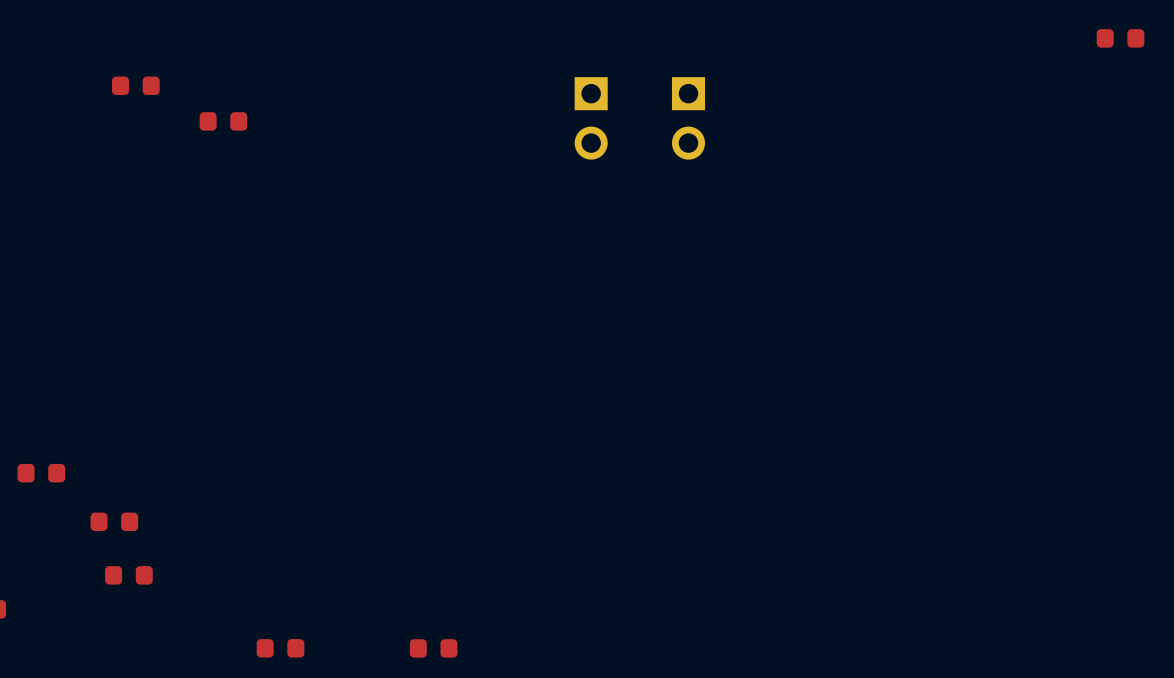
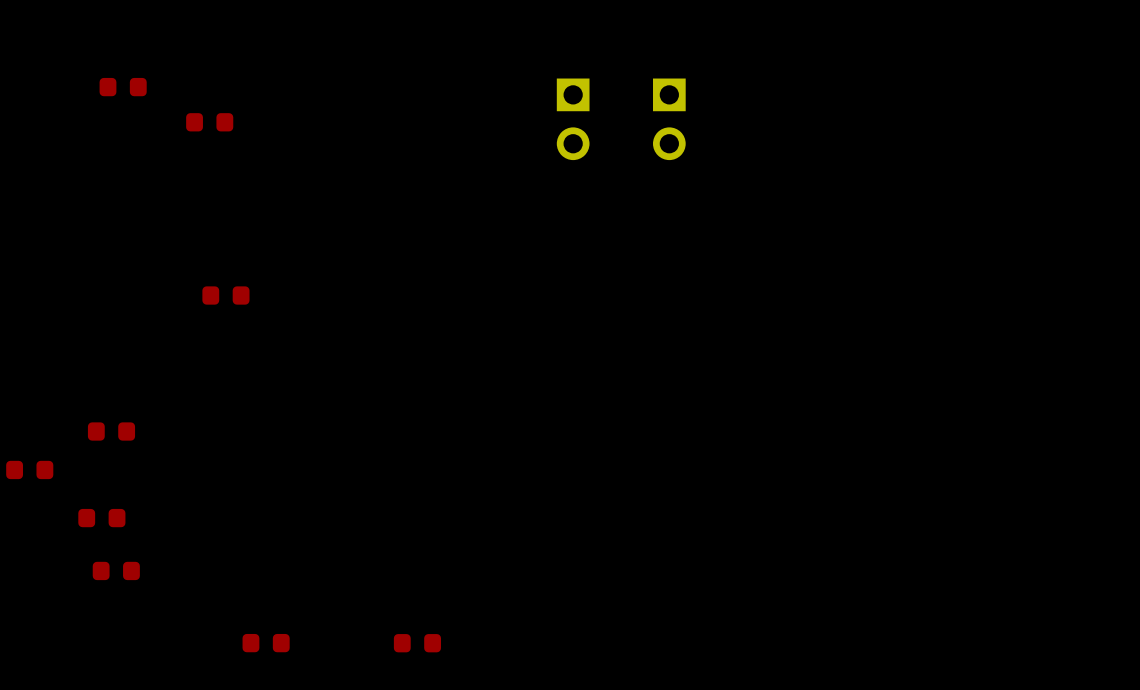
part: (1120, 38) -> none
part: none -> (225, 295)
part: none -> (111, 431)

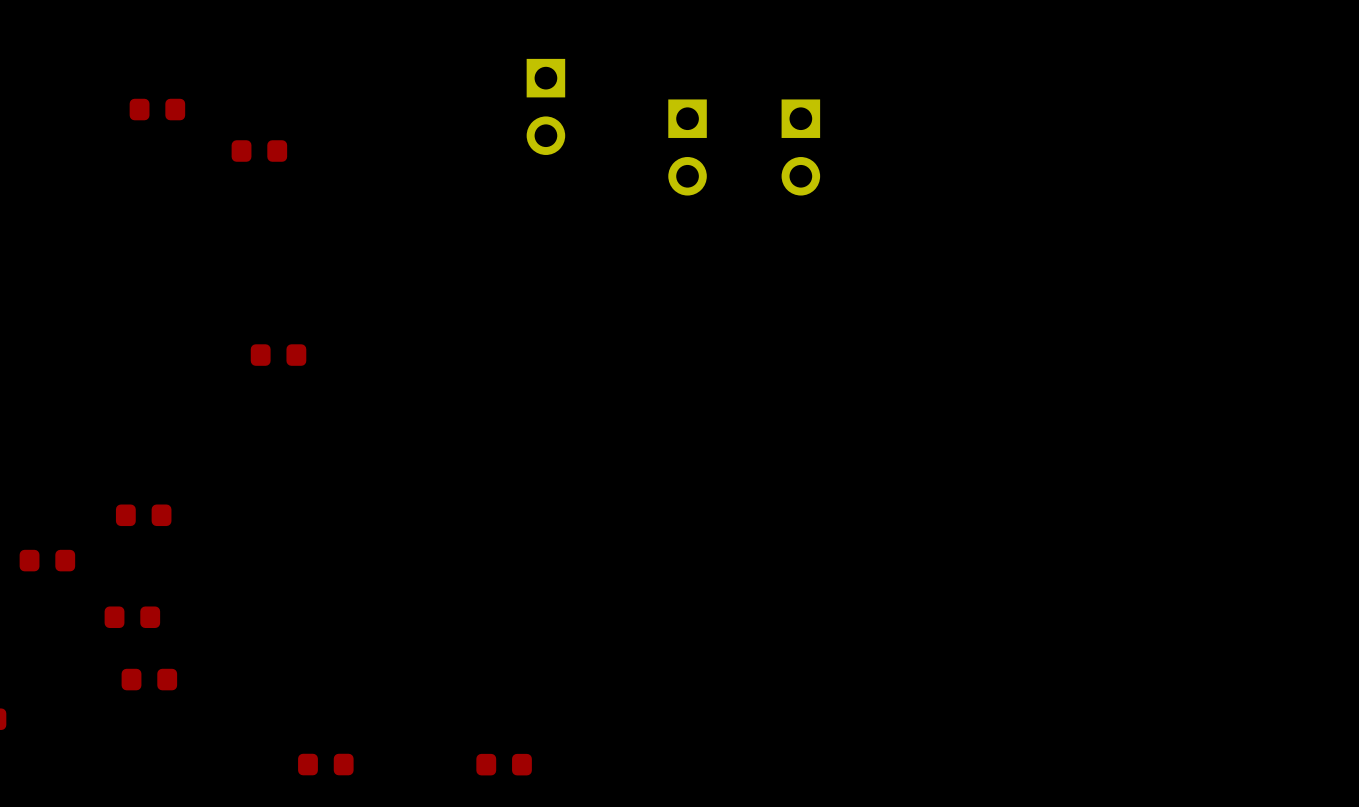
part: none -> (545, 106)

